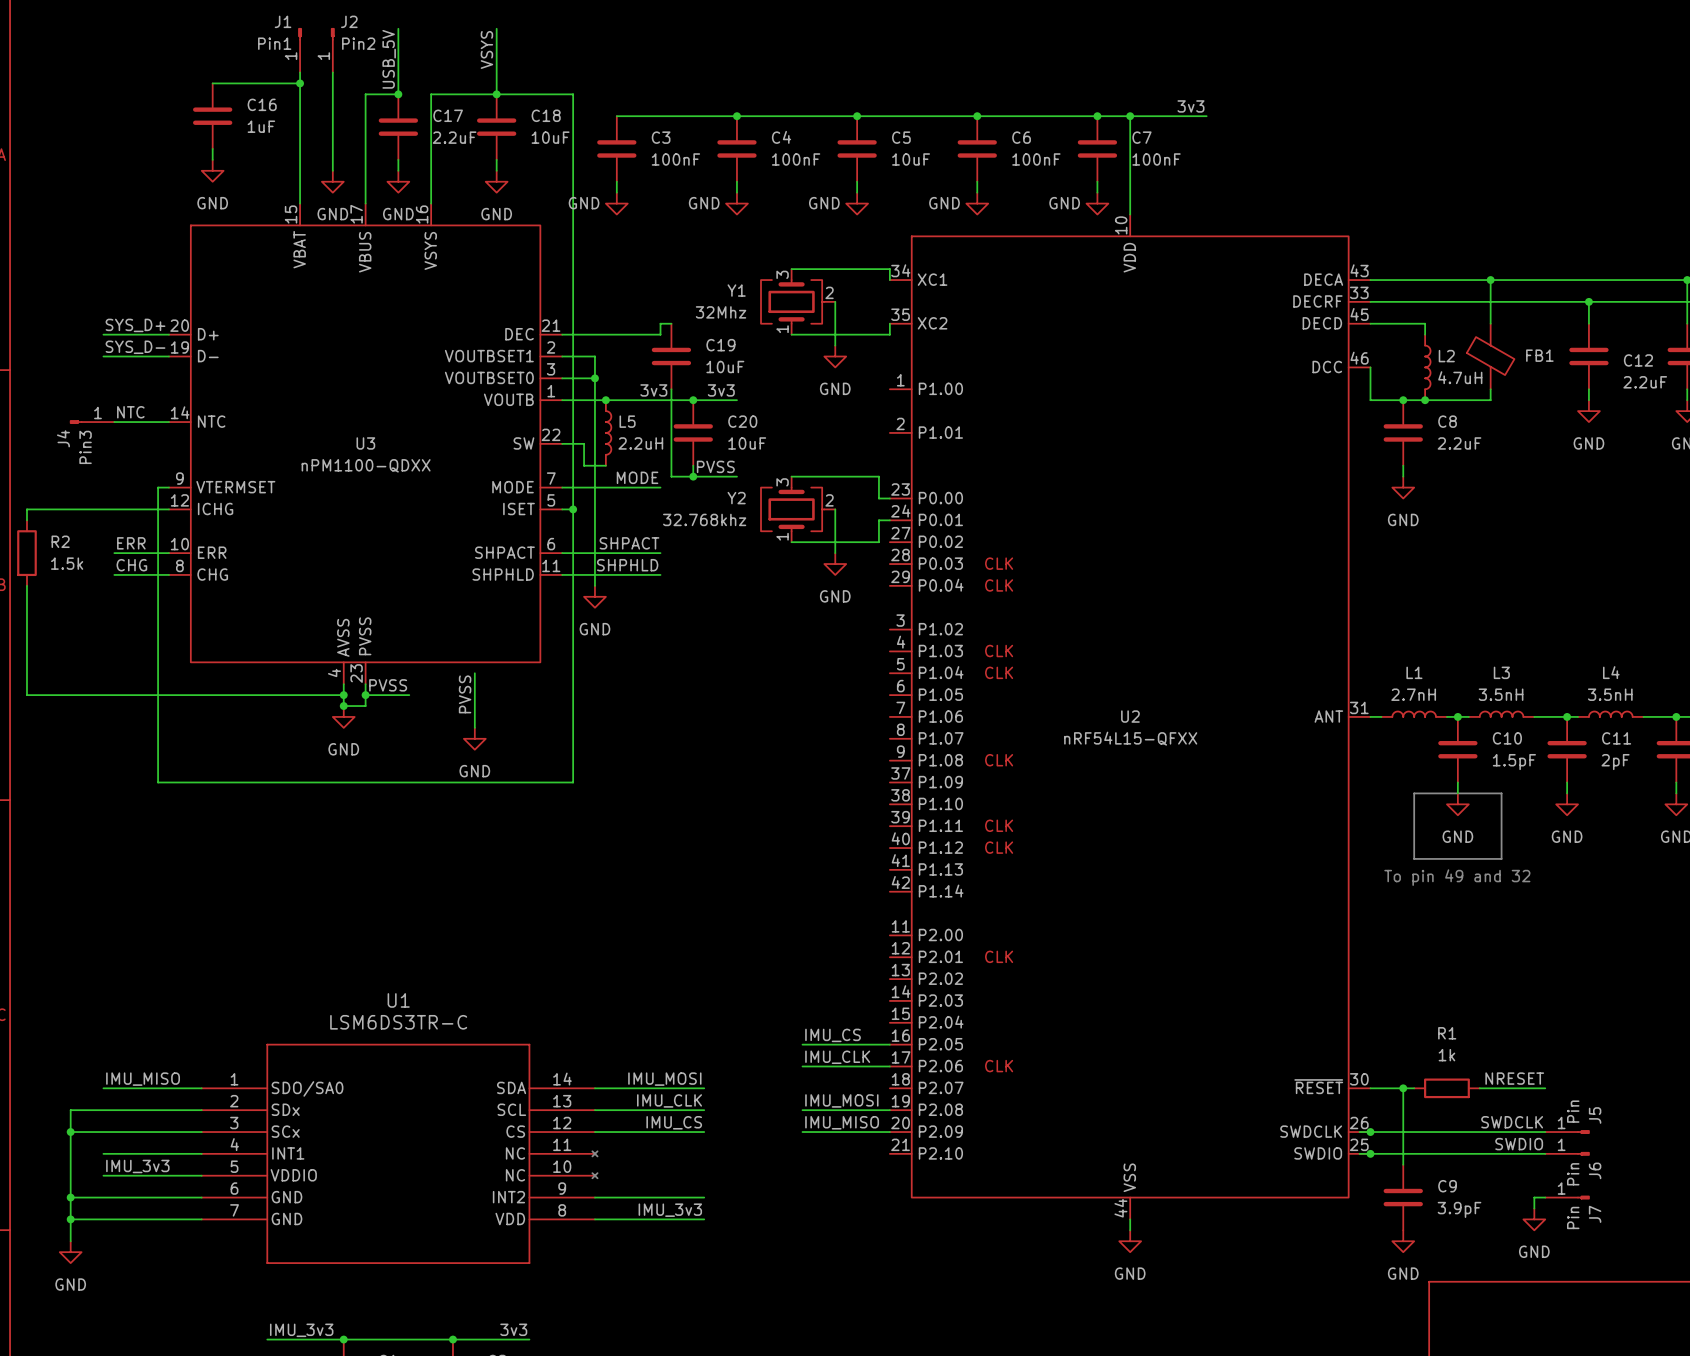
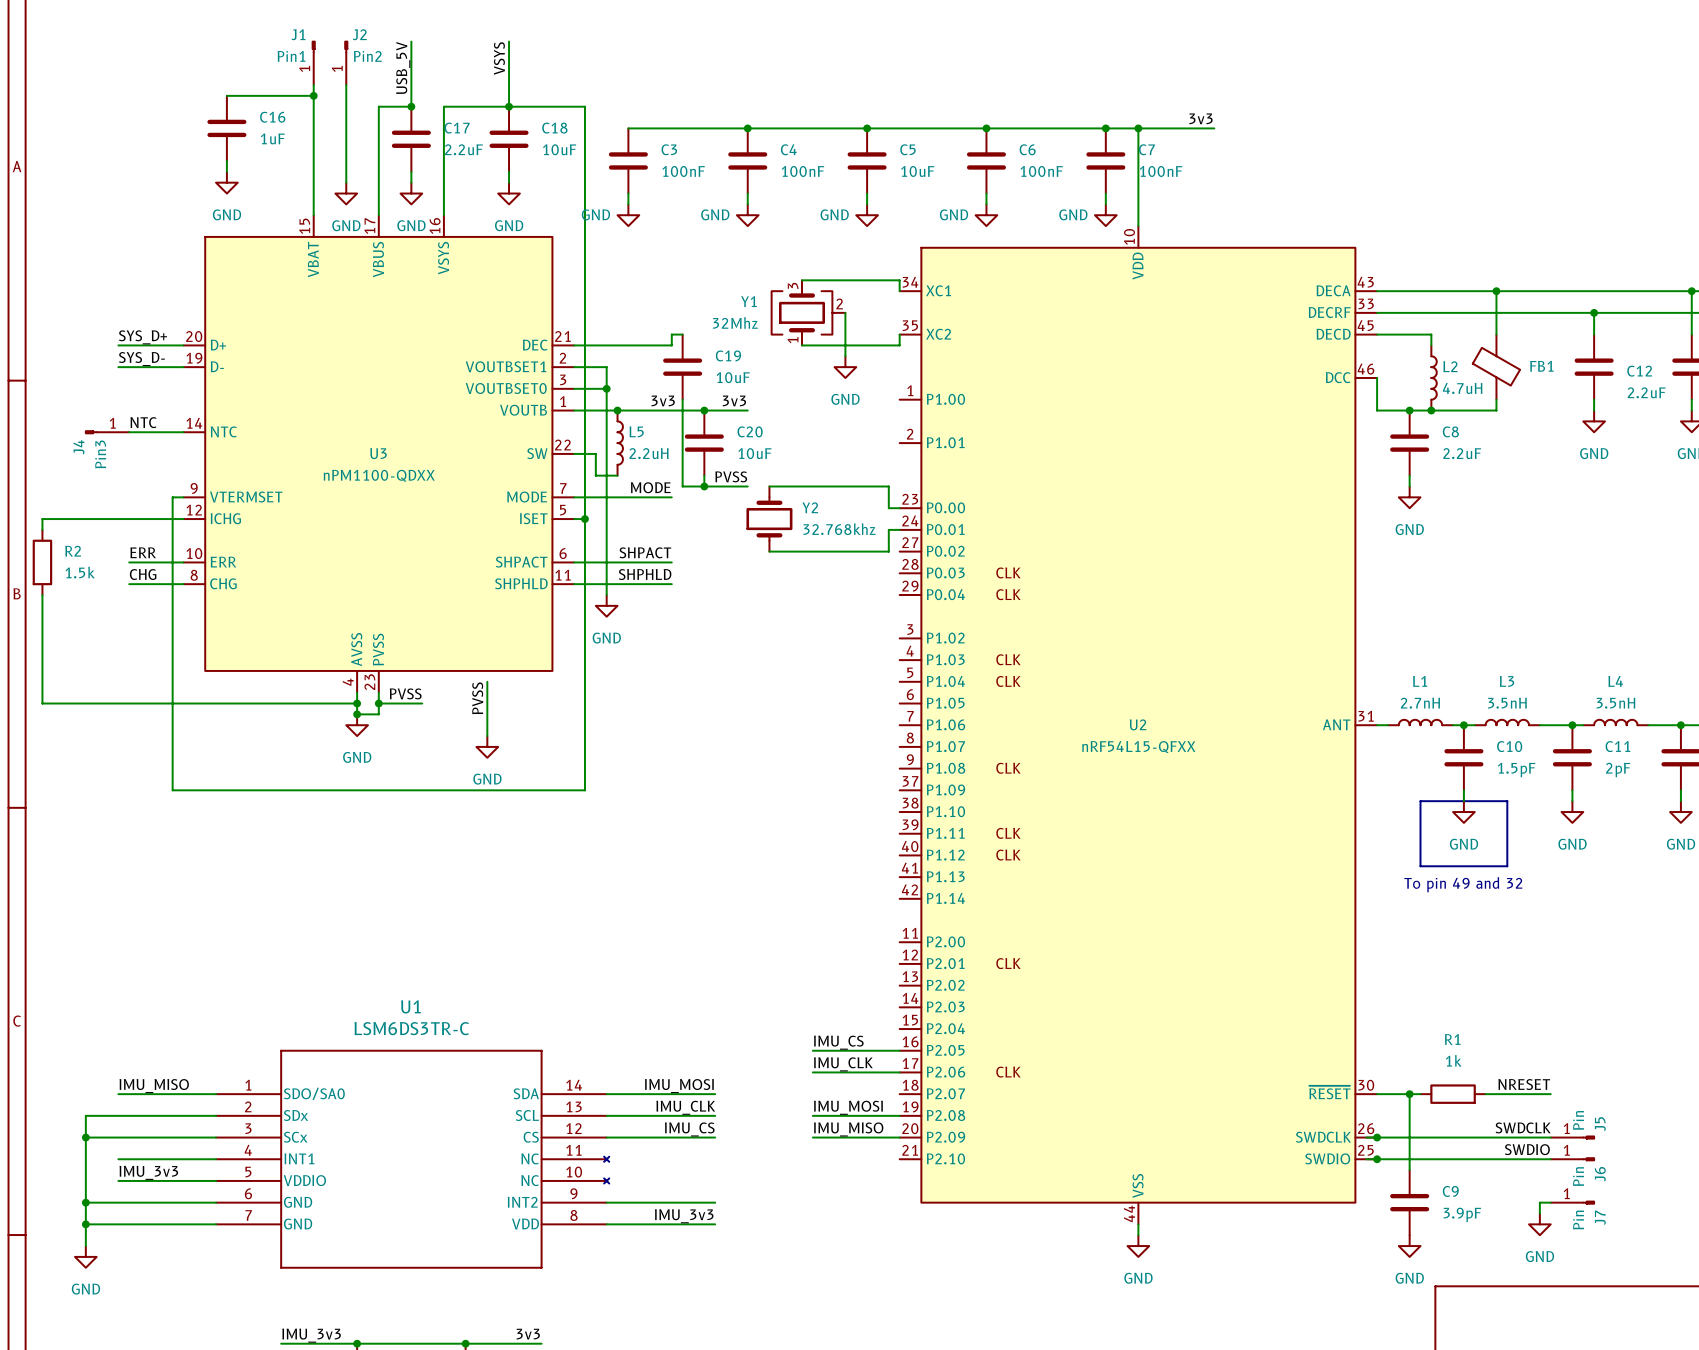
wire: none -> (769, 486) (802, 486)
Y2 symbol: [761, 476, 836, 543] -> [746, 486, 793, 552]
Y2 name position: Y2 (736, 498) -> Y2 (810, 507)
wire: (835, 509) (835, 553) -> none
Y2 value position: 32.768khz (704, 519) -> 32.768khz (839, 529)
wire: none -> (769, 551) (802, 551)
power symbol: GND (835, 564) -> none

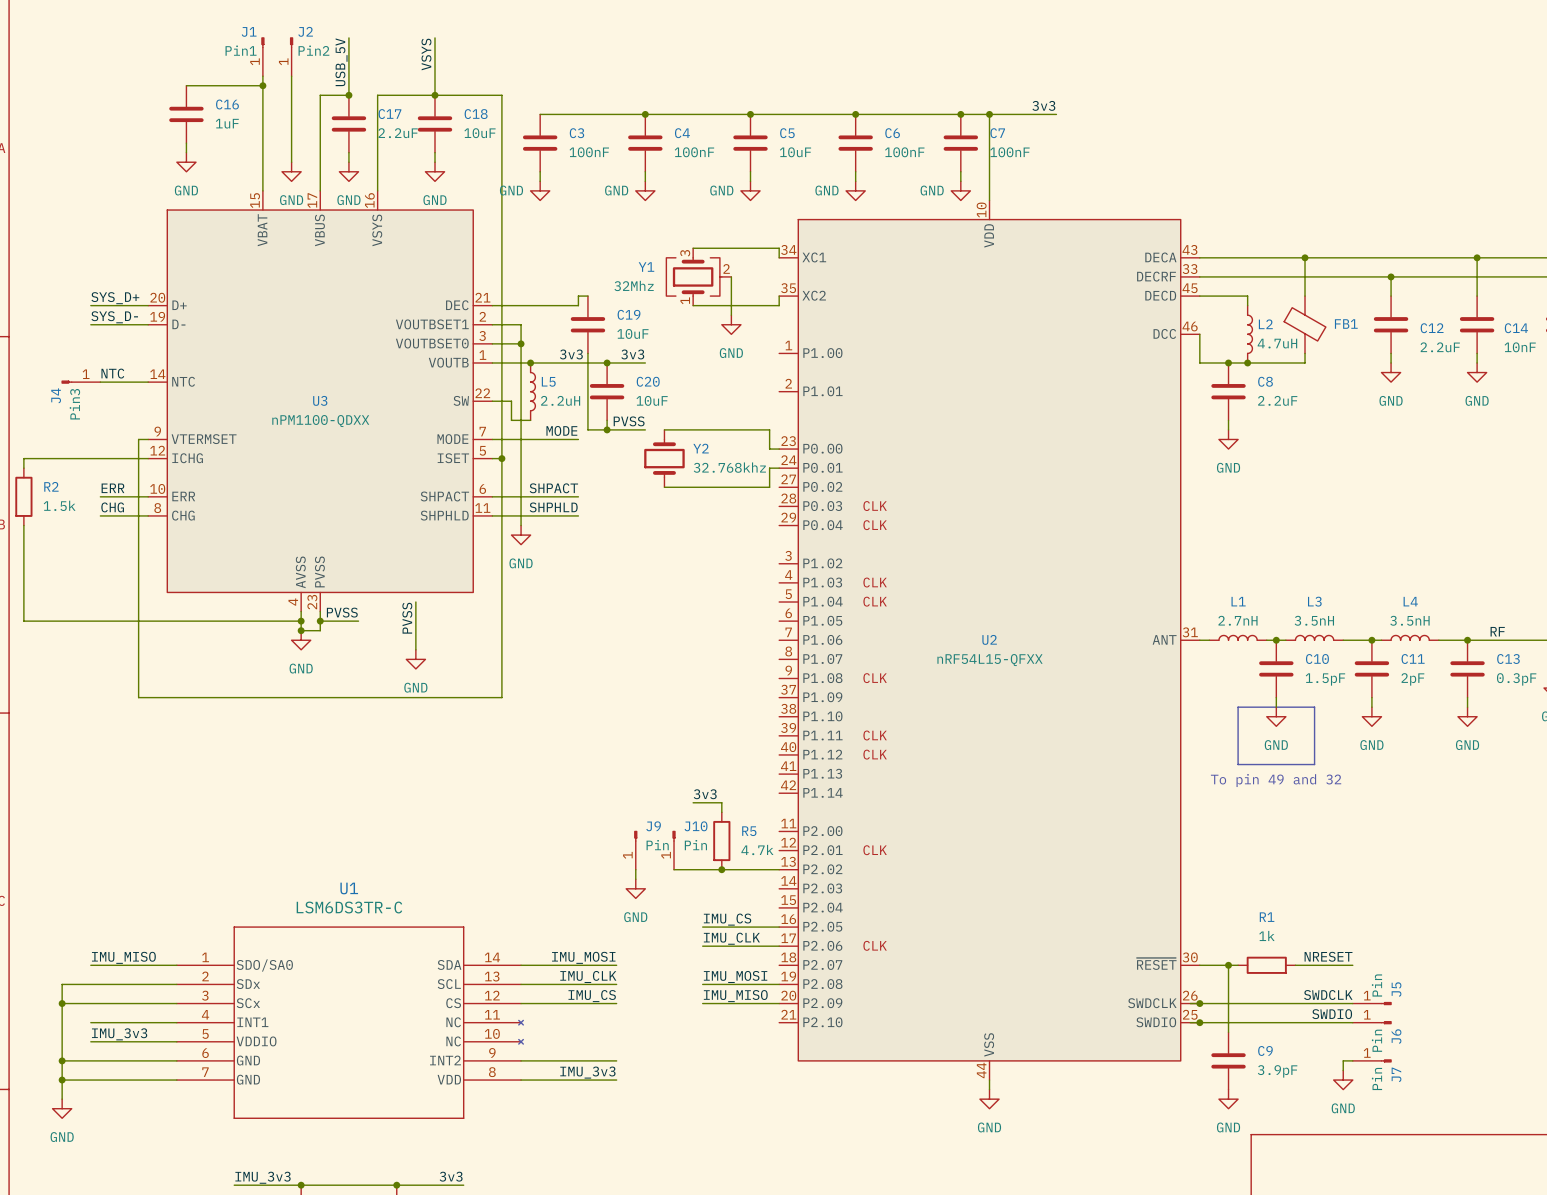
label: none -> 3v3 (705, 794)
wire: none -> (693, 802) (721, 802) (721, 812)
R5: none -> 4.7k (721, 841)
J9: none -> Pin (635, 850)
J10: none -> Pin (674, 850)
wire: none -> (635, 869) (635, 879)
wire: none -> (674, 869) (779, 869)
junction: none -> (721, 869)
power symbol: none -> GND (635, 888)

